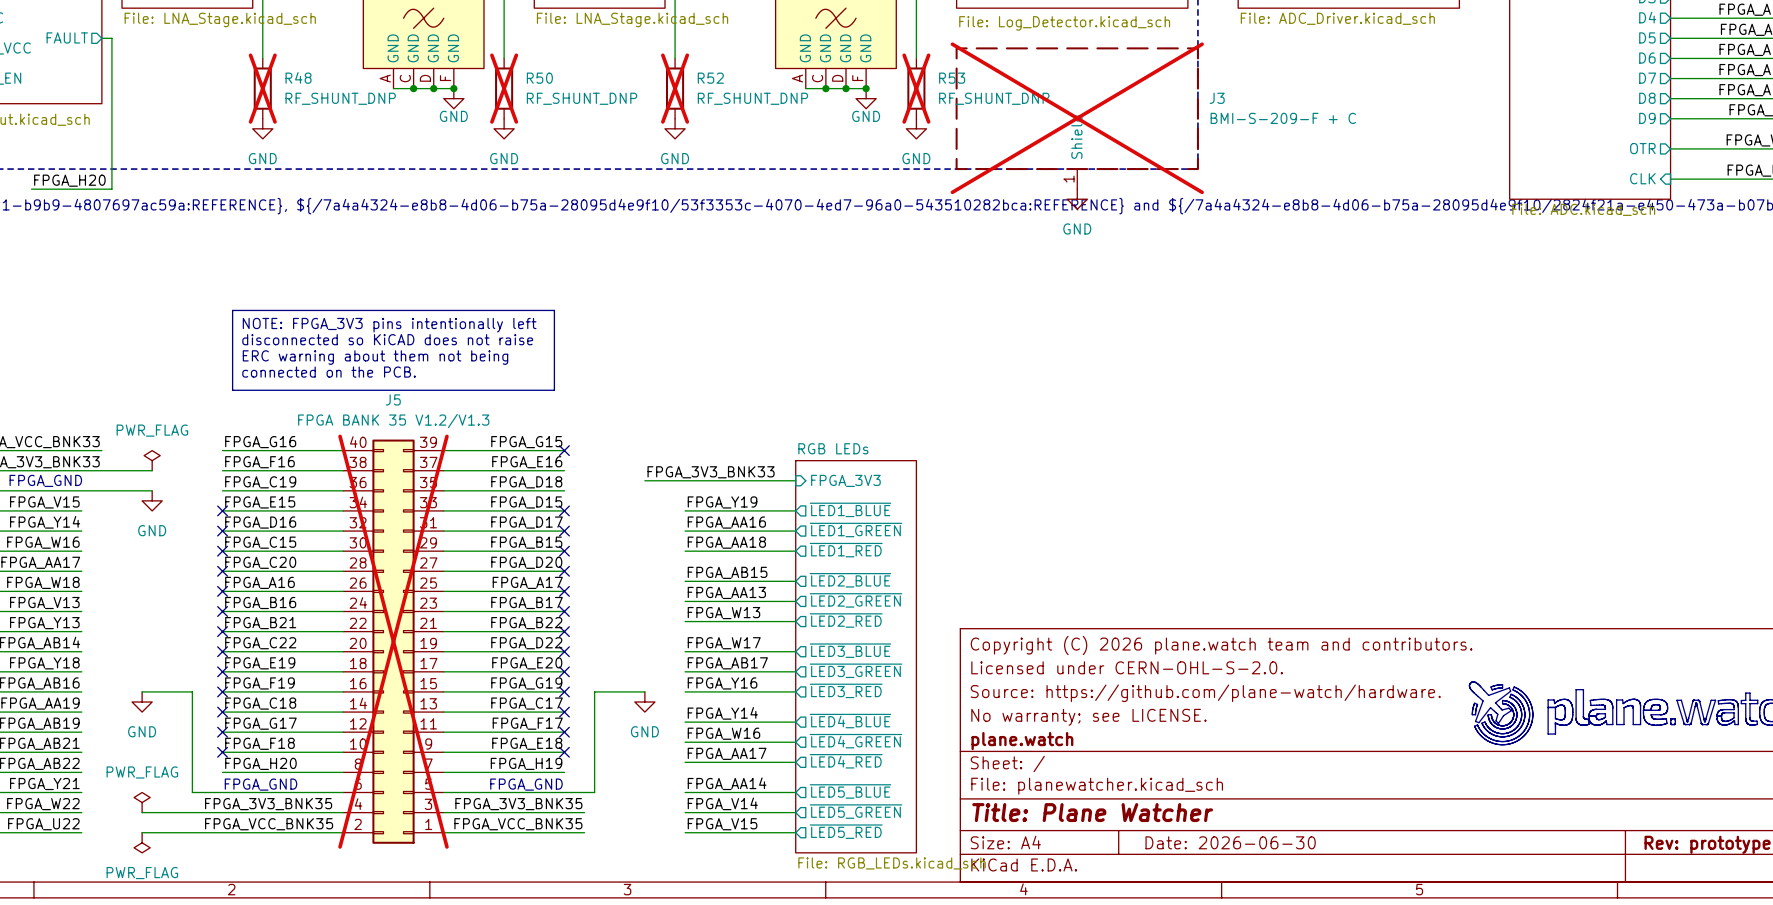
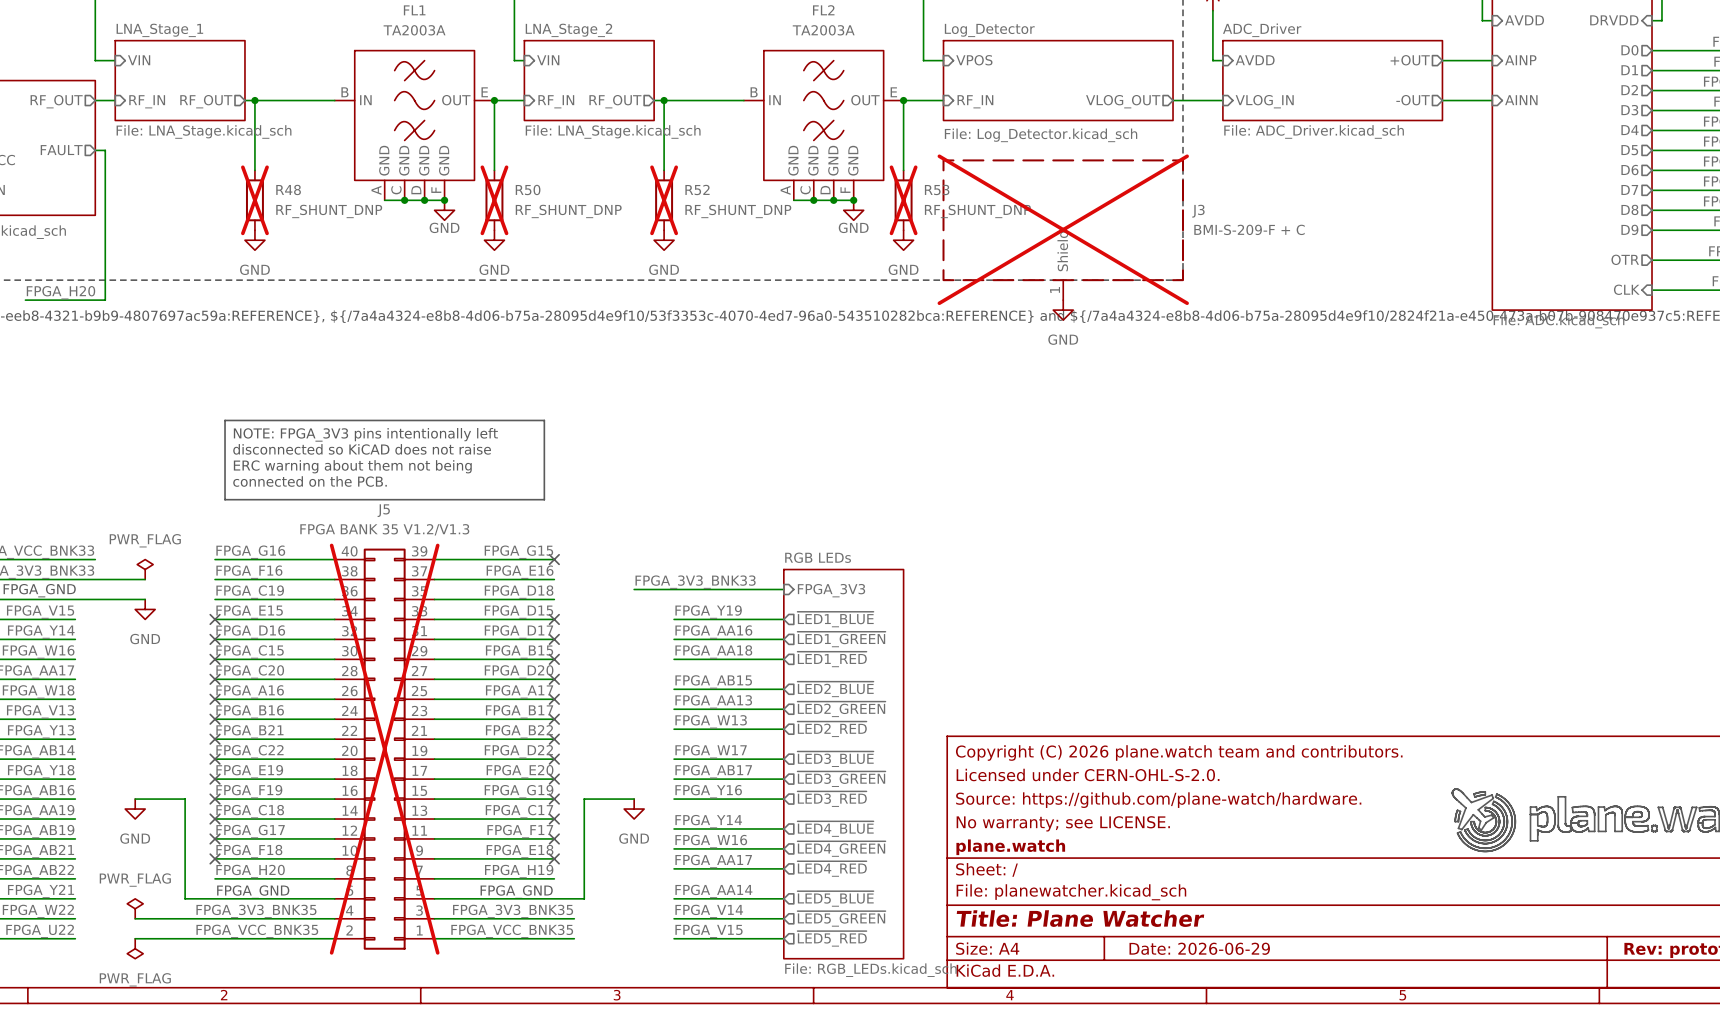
title block: Date: 2026-06-30 (1230, 842) -> Date: 2026-06-29 (1199, 948)

